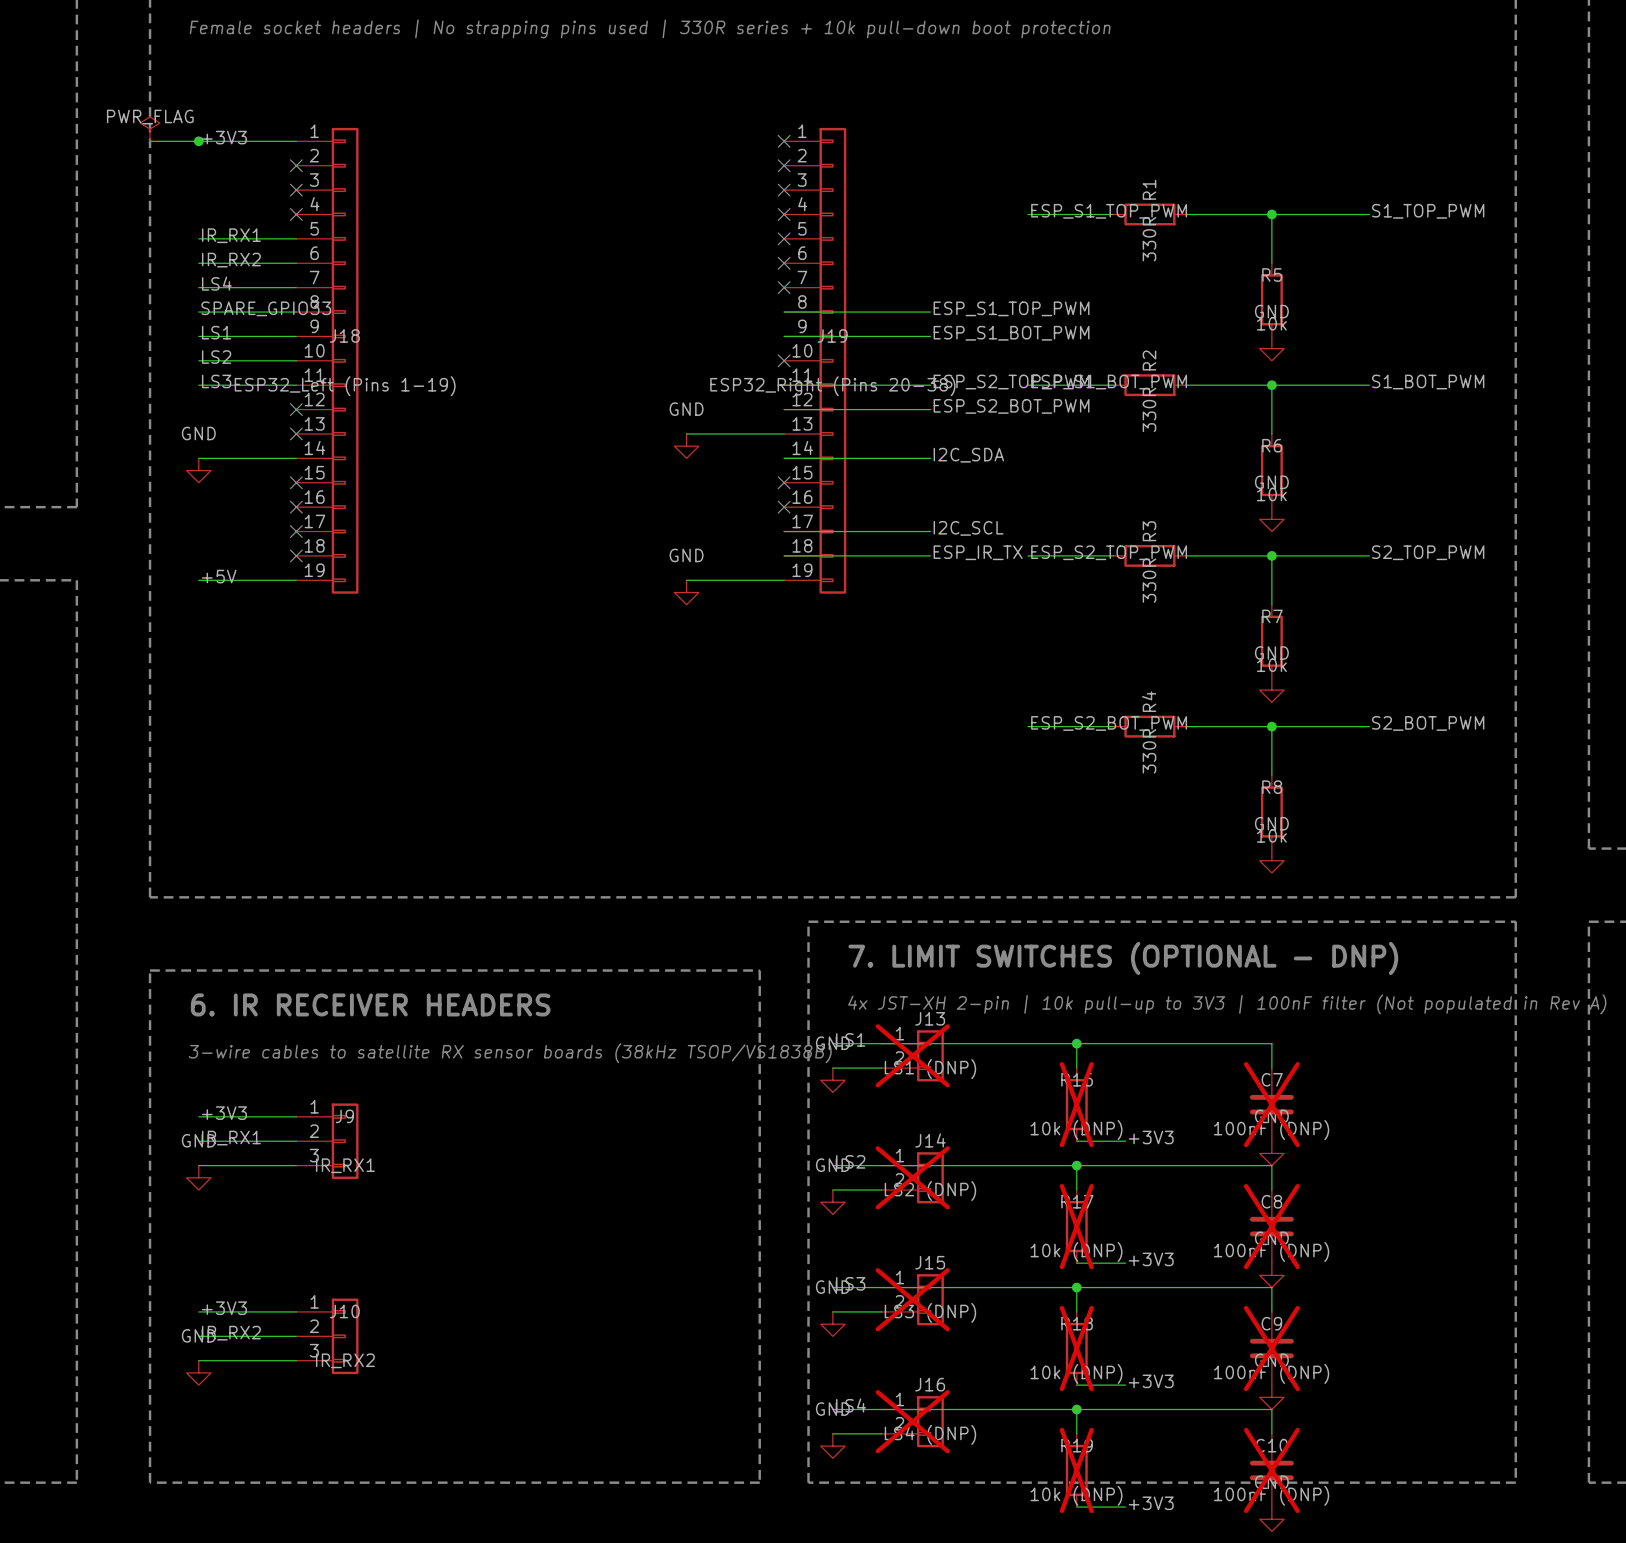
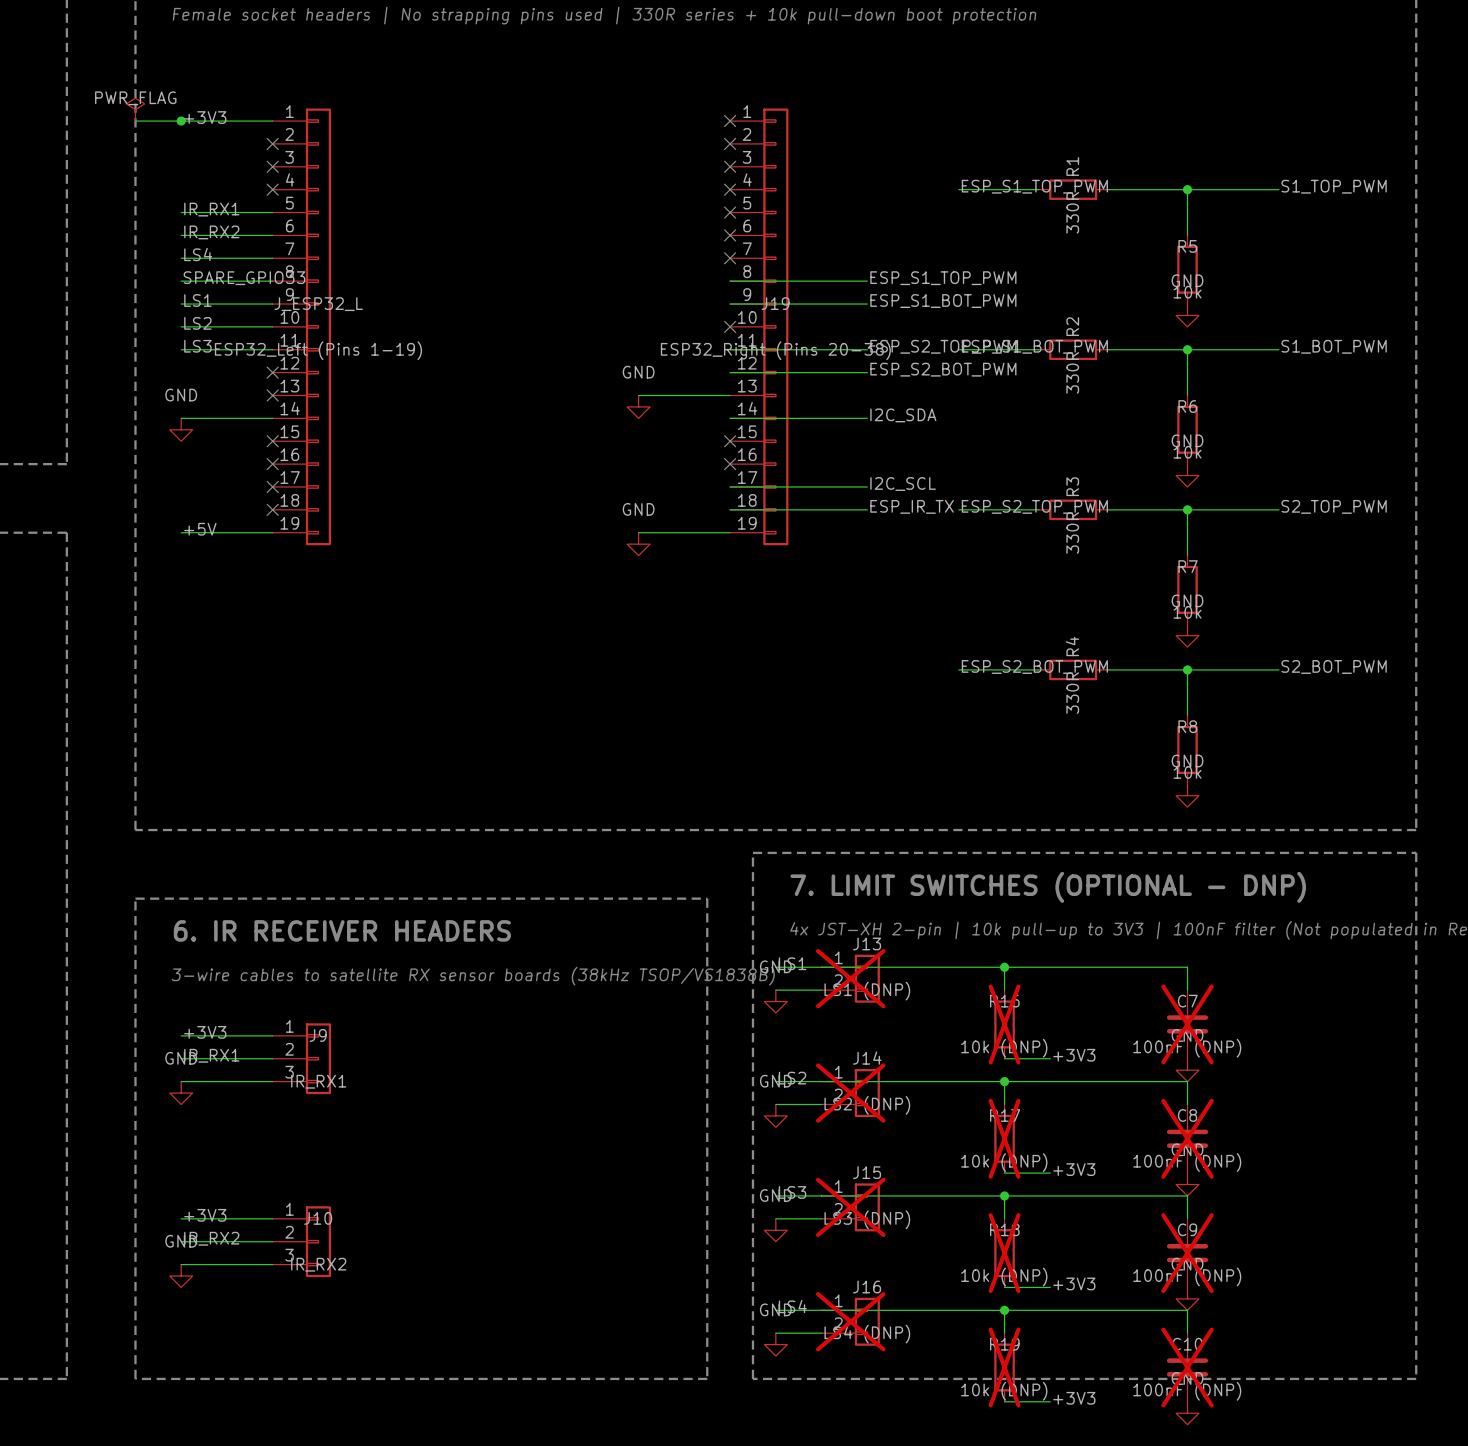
J18 name: J18 (344, 335) -> J_ESP32_L (318, 304)

